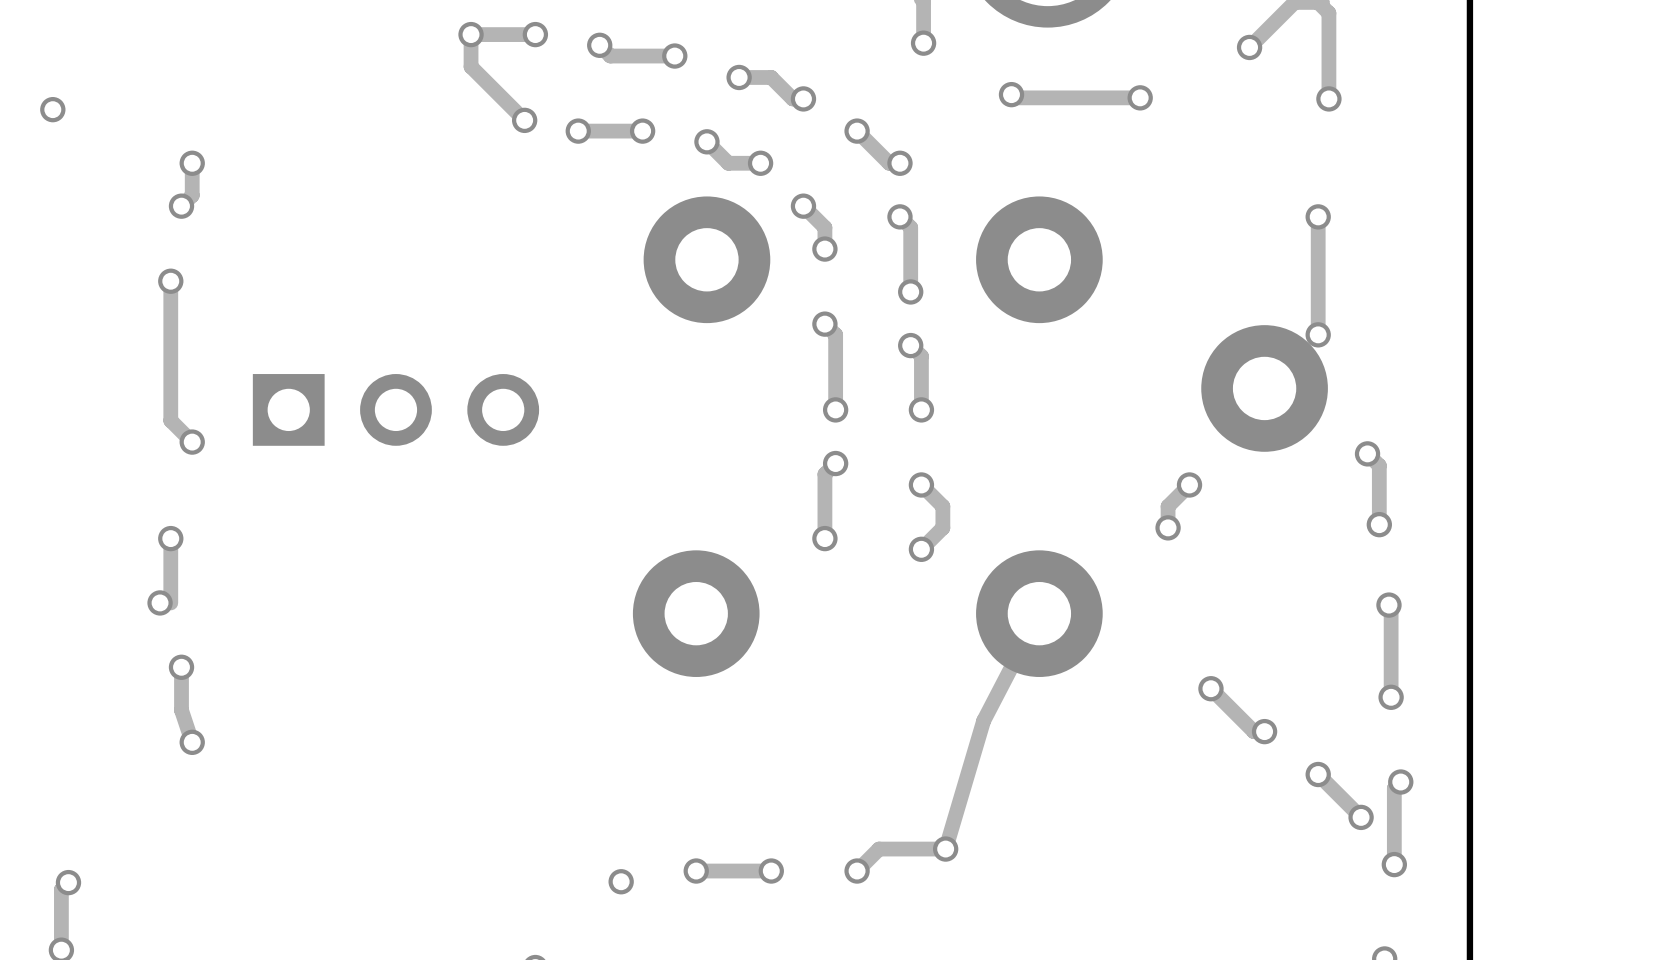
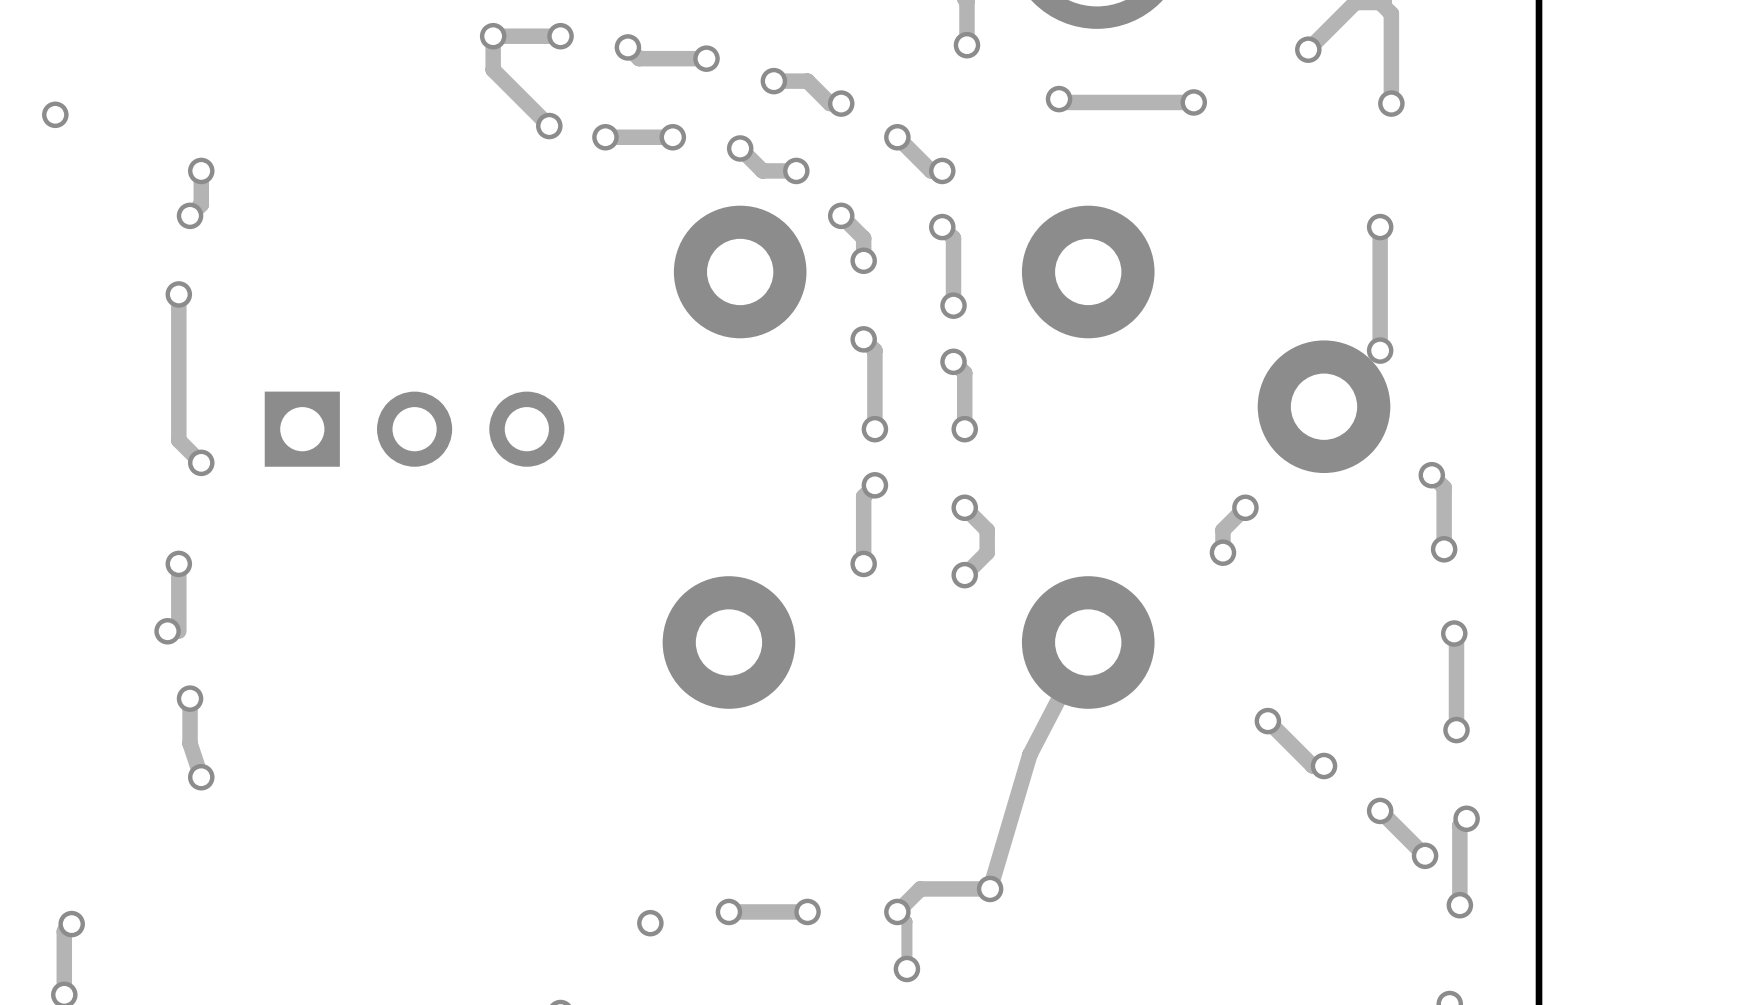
track: none -> (897, 911) (906, 921) (906, 968) (909, 968)
via: none -> (906, 968)

